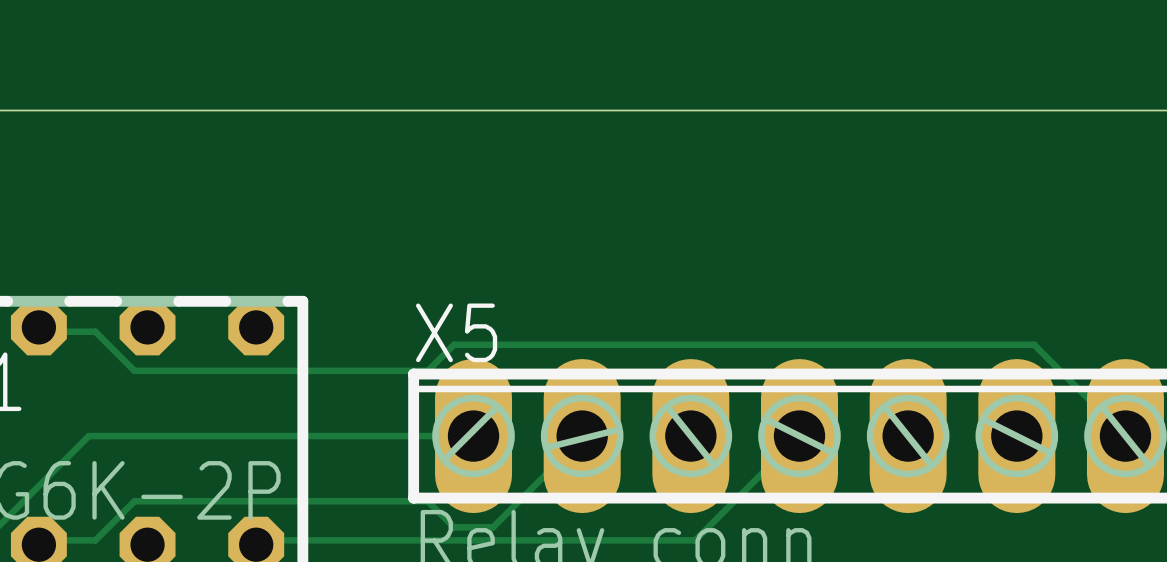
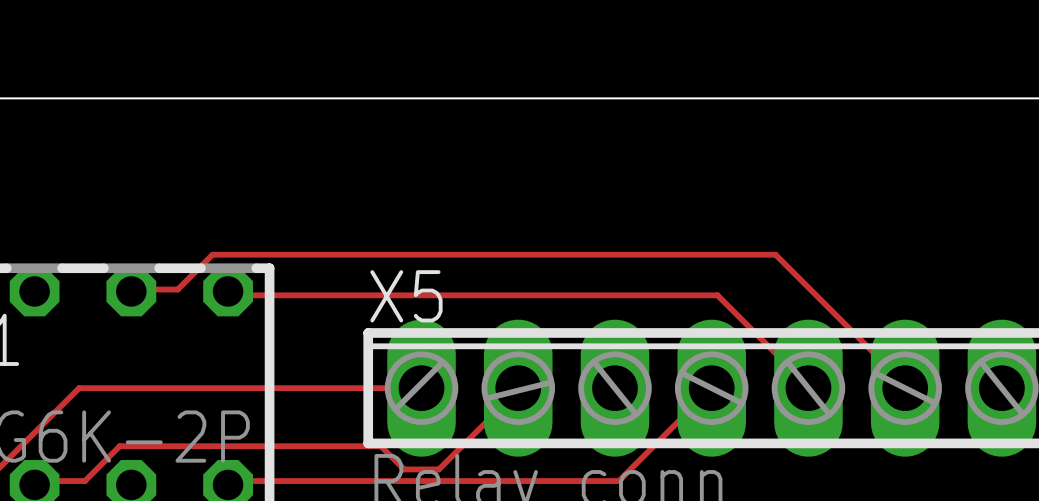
track: (38, 327) (43, 331) (95, 331) (134, 370) (427, 370) (453, 344) (1034, 344) (1125, 436) -> none
track: none -> (131, 291) (131, 289) (177, 289) (212, 254) (775, 254) (909, 388) (905, 388)
track: none -> (228, 291) (230, 295) (717, 295) (810, 388) (808, 388)

